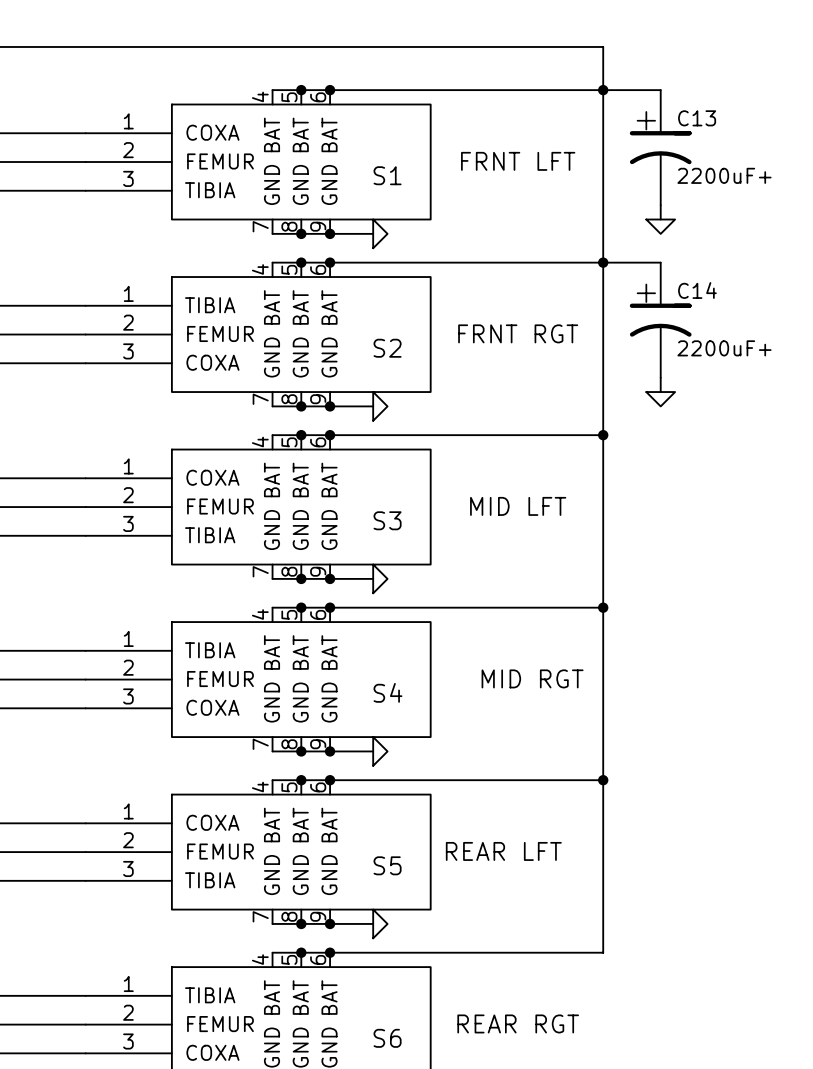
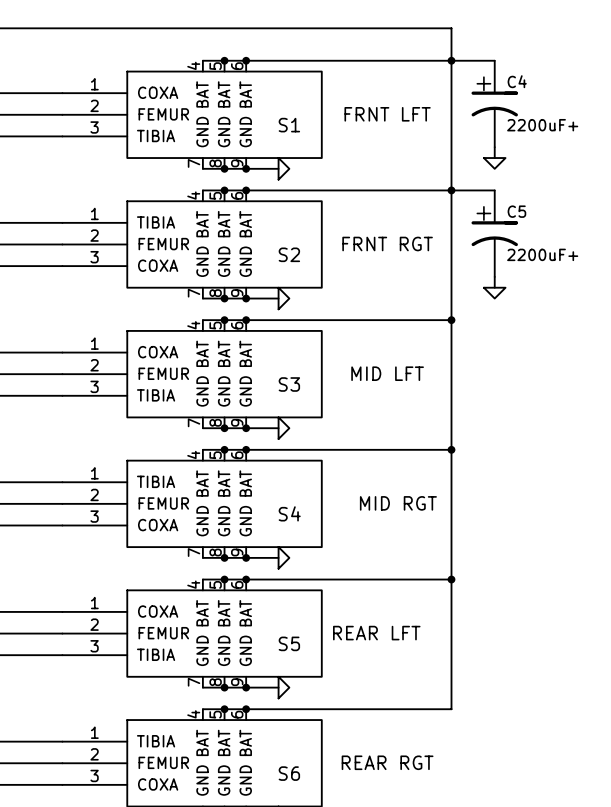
C13 name: C13 (697, 118) -> C4 (517, 81)
C14 name: C14 (697, 290) -> C5 (516, 211)

